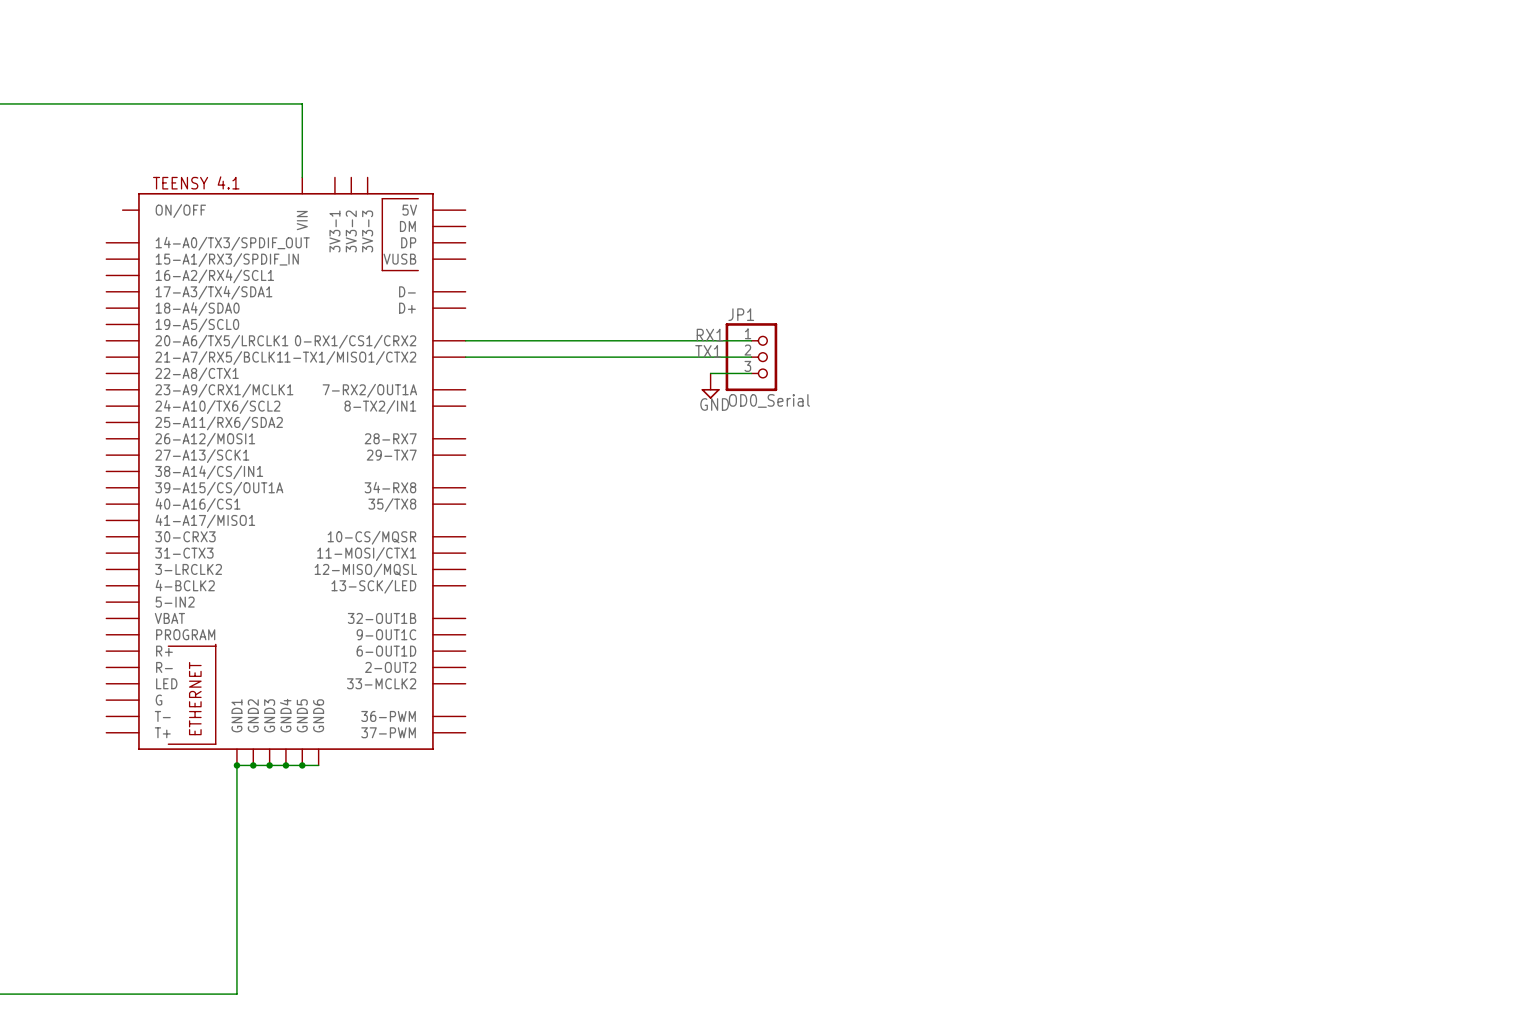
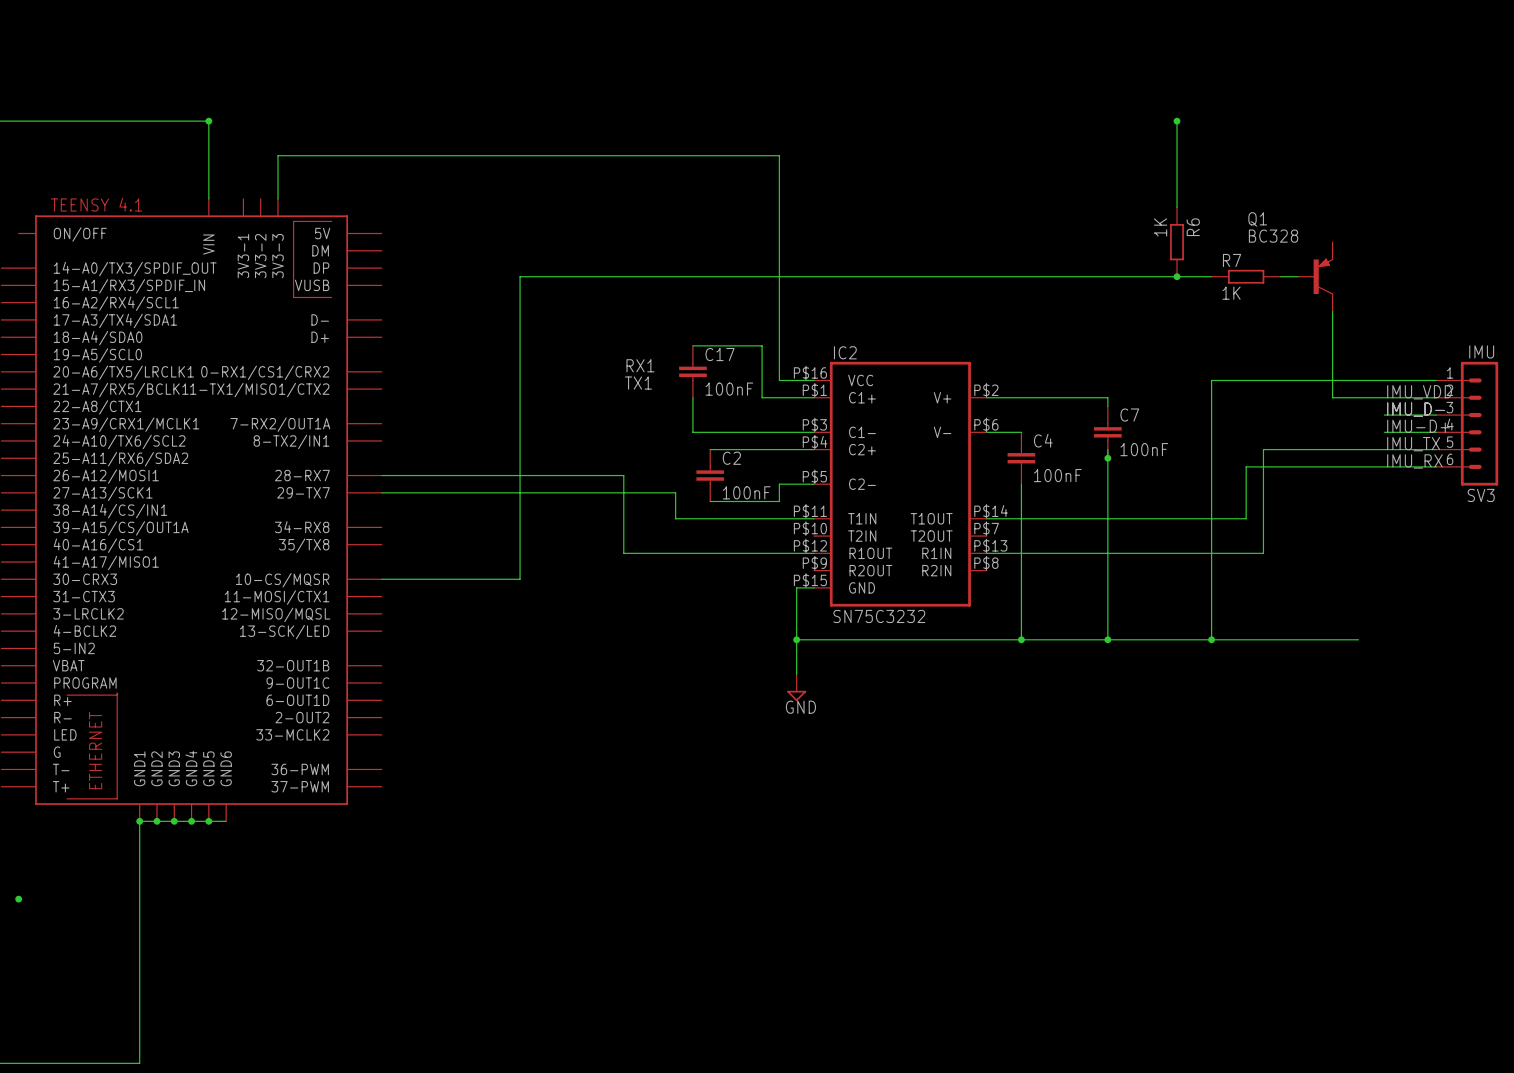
junction: none -> (208, 121)
wire: none -> (1177, 121) (1177, 207)
junction: none -> (1177, 121)
wire: none -> (278, 198) (278, 155) (779, 155) (779, 380) (813, 380)
R6: none -> 1K (1177, 242)
junction: none -> (1177, 276)
wire: none -> (1211, 276) (520, 276) (520, 579) (381, 579)
R7: none -> 1K (1246, 276)
wire: none -> (1280, 276) (1298, 276)
Q1: none -> BC328 (1315, 276)
wire: none -> (1332, 311) (1332, 397) (1436, 397)
wire: none -> (692, 345) (762, 345) (762, 397) (813, 397)
wire: (465, 340) (751, 340) -> none
C17: none -> 100nF (692, 371)
wire: none -> (1436, 380) (1211, 380) (1211, 639)
wire: (465, 357) (751, 357) -> none
JP1: OD0_Serial (751, 357) -> none
label: none -> IMU_VDD (1419, 392)
wire: none -> (692, 397) (692, 432) (813, 432)
wire: none -> (986, 397) (1107, 397) (1107, 406)
wire: (710, 373) (751, 373) -> none
label: none -> IMU_D- (1415, 409)
wire: none -> (1384, 415) (1436, 415)
power symbol: GND (710, 386) -> none
SV3: none -> IMU (1467, 423)
label: none -> IMU-D+ (1418, 426)
wire: none -> (986, 432) (1021, 432)
C7: none -> 100nF (1107, 432)
wire: none -> (1384, 432) (1436, 432)
label: none -> IMU_TX (1413, 444)
wire: none -> (710, 449) (813, 449)
wire: none -> (1107, 449) (1107, 639)
wire: none -> (1436, 449) (1263, 449) (1263, 553) (986, 553)
C4: none -> 100nF (1021, 458)
junction: none -> (1107, 458)
label: none -> IMU_RX (1414, 461)
wire: none -> (1436, 466) (1246, 466) (1246, 518) (986, 518)
wire: none -> (381, 475) (623, 475) (623, 553) (813, 553)
C2: none -> 100nF (710, 475)
wire: none -> (813, 484) (779, 484) (779, 501) (710, 501)
IC2: none -> SN75C3232 (900, 484)
wire: none -> (1021, 484) (1021, 639)
wire: none -> (381, 492) (675, 492) (675, 518) (813, 518)
wire: none -> (813, 587) (796, 587) (796, 674)
wire: none -> (796, 639) (1358, 639)
junction: none -> (796, 639)
junction: none -> (1021, 639)
junction: none -> (1107, 639)
junction: none -> (1211, 639)
power symbol: none -> GND (796, 687)
junction: none -> (18, 899)

